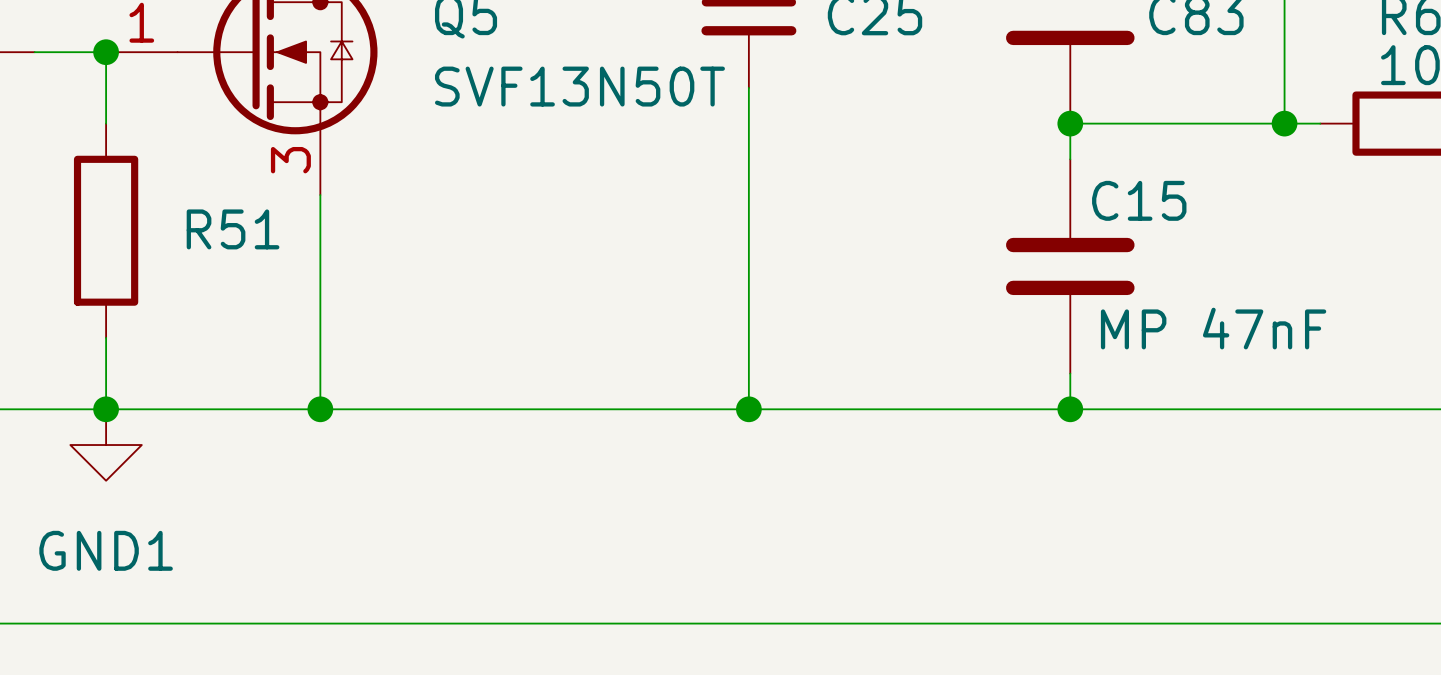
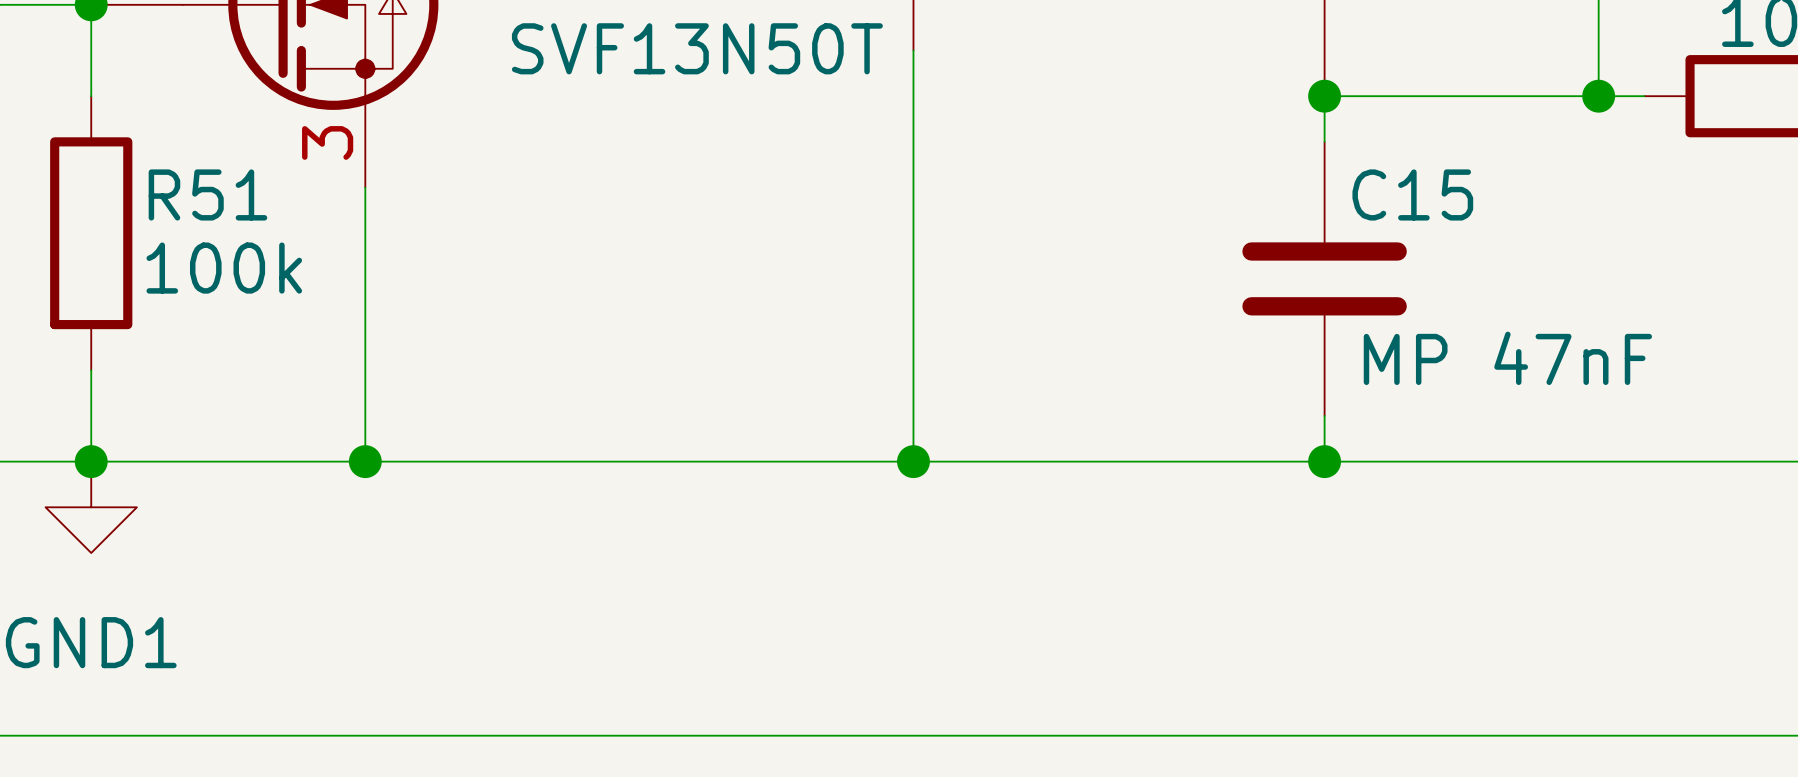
R51 name position: R51 (233, 229) -> R51 (207, 194)
R51 value: none -> 100k (224, 268)

